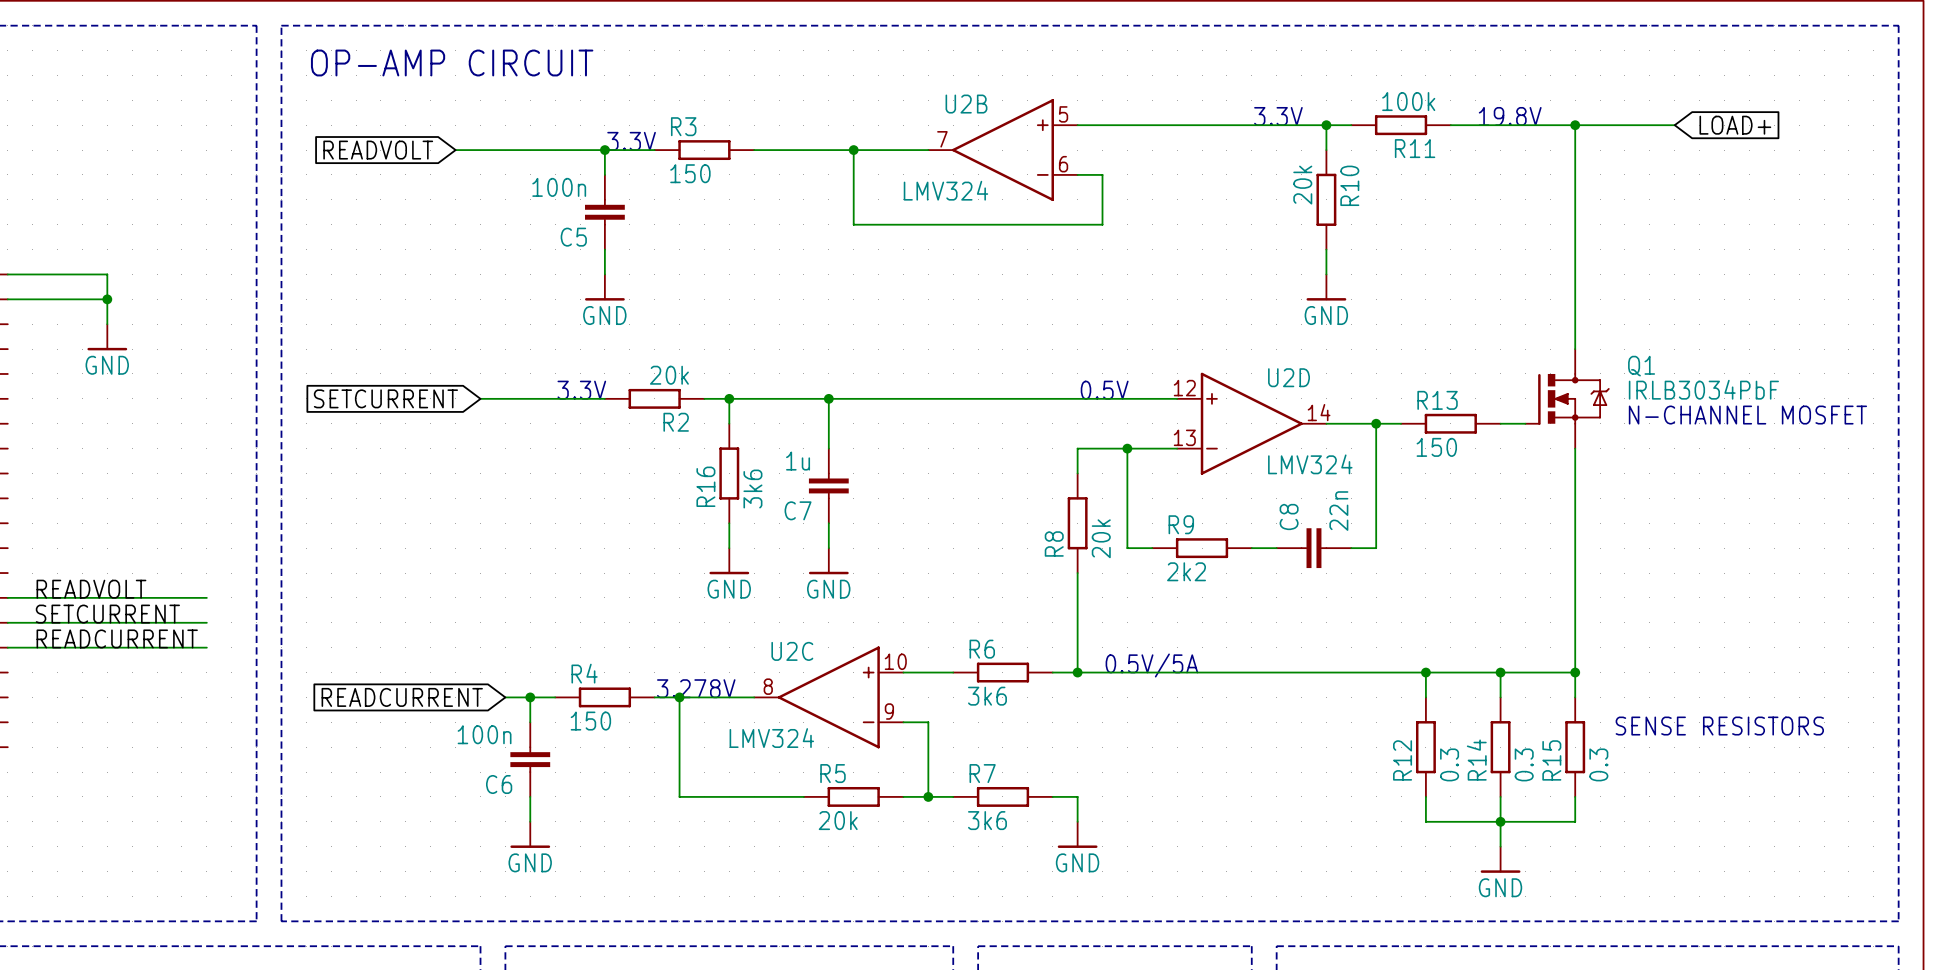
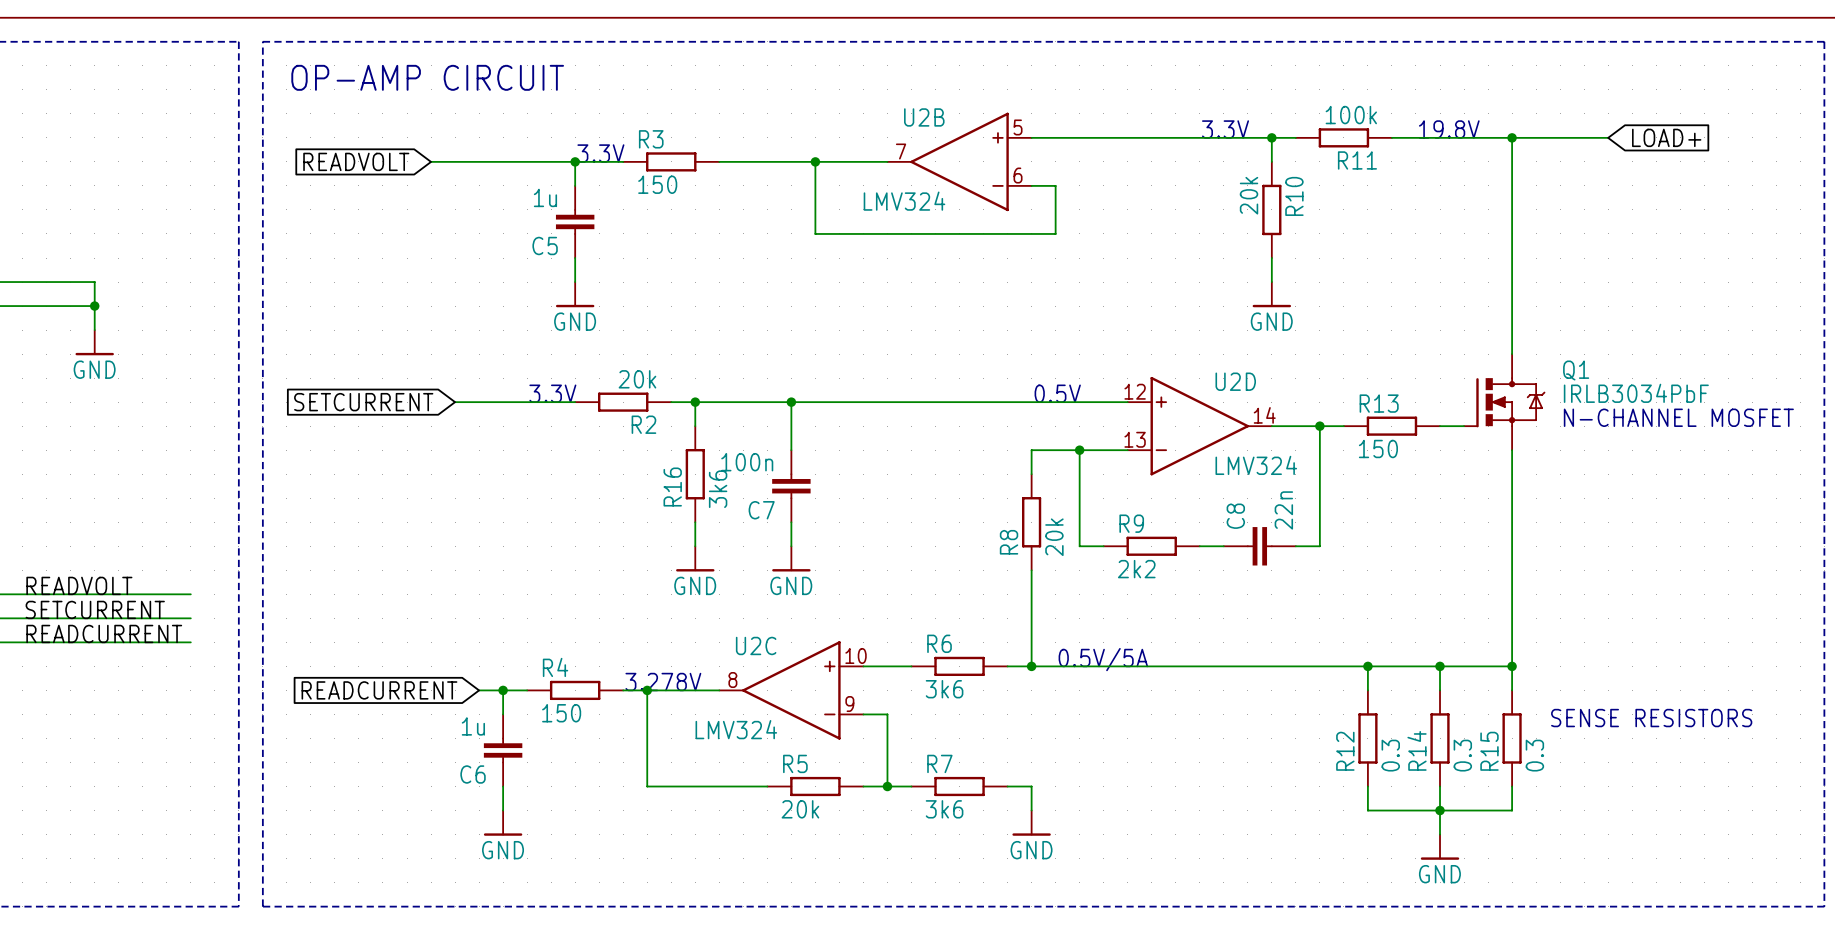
C5 value: 100n (559, 187) -> 1u (545, 197)
C7 value: 1u (798, 461) -> 100n (747, 462)
C6 value: 100n (484, 734) -> 1u (473, 726)

